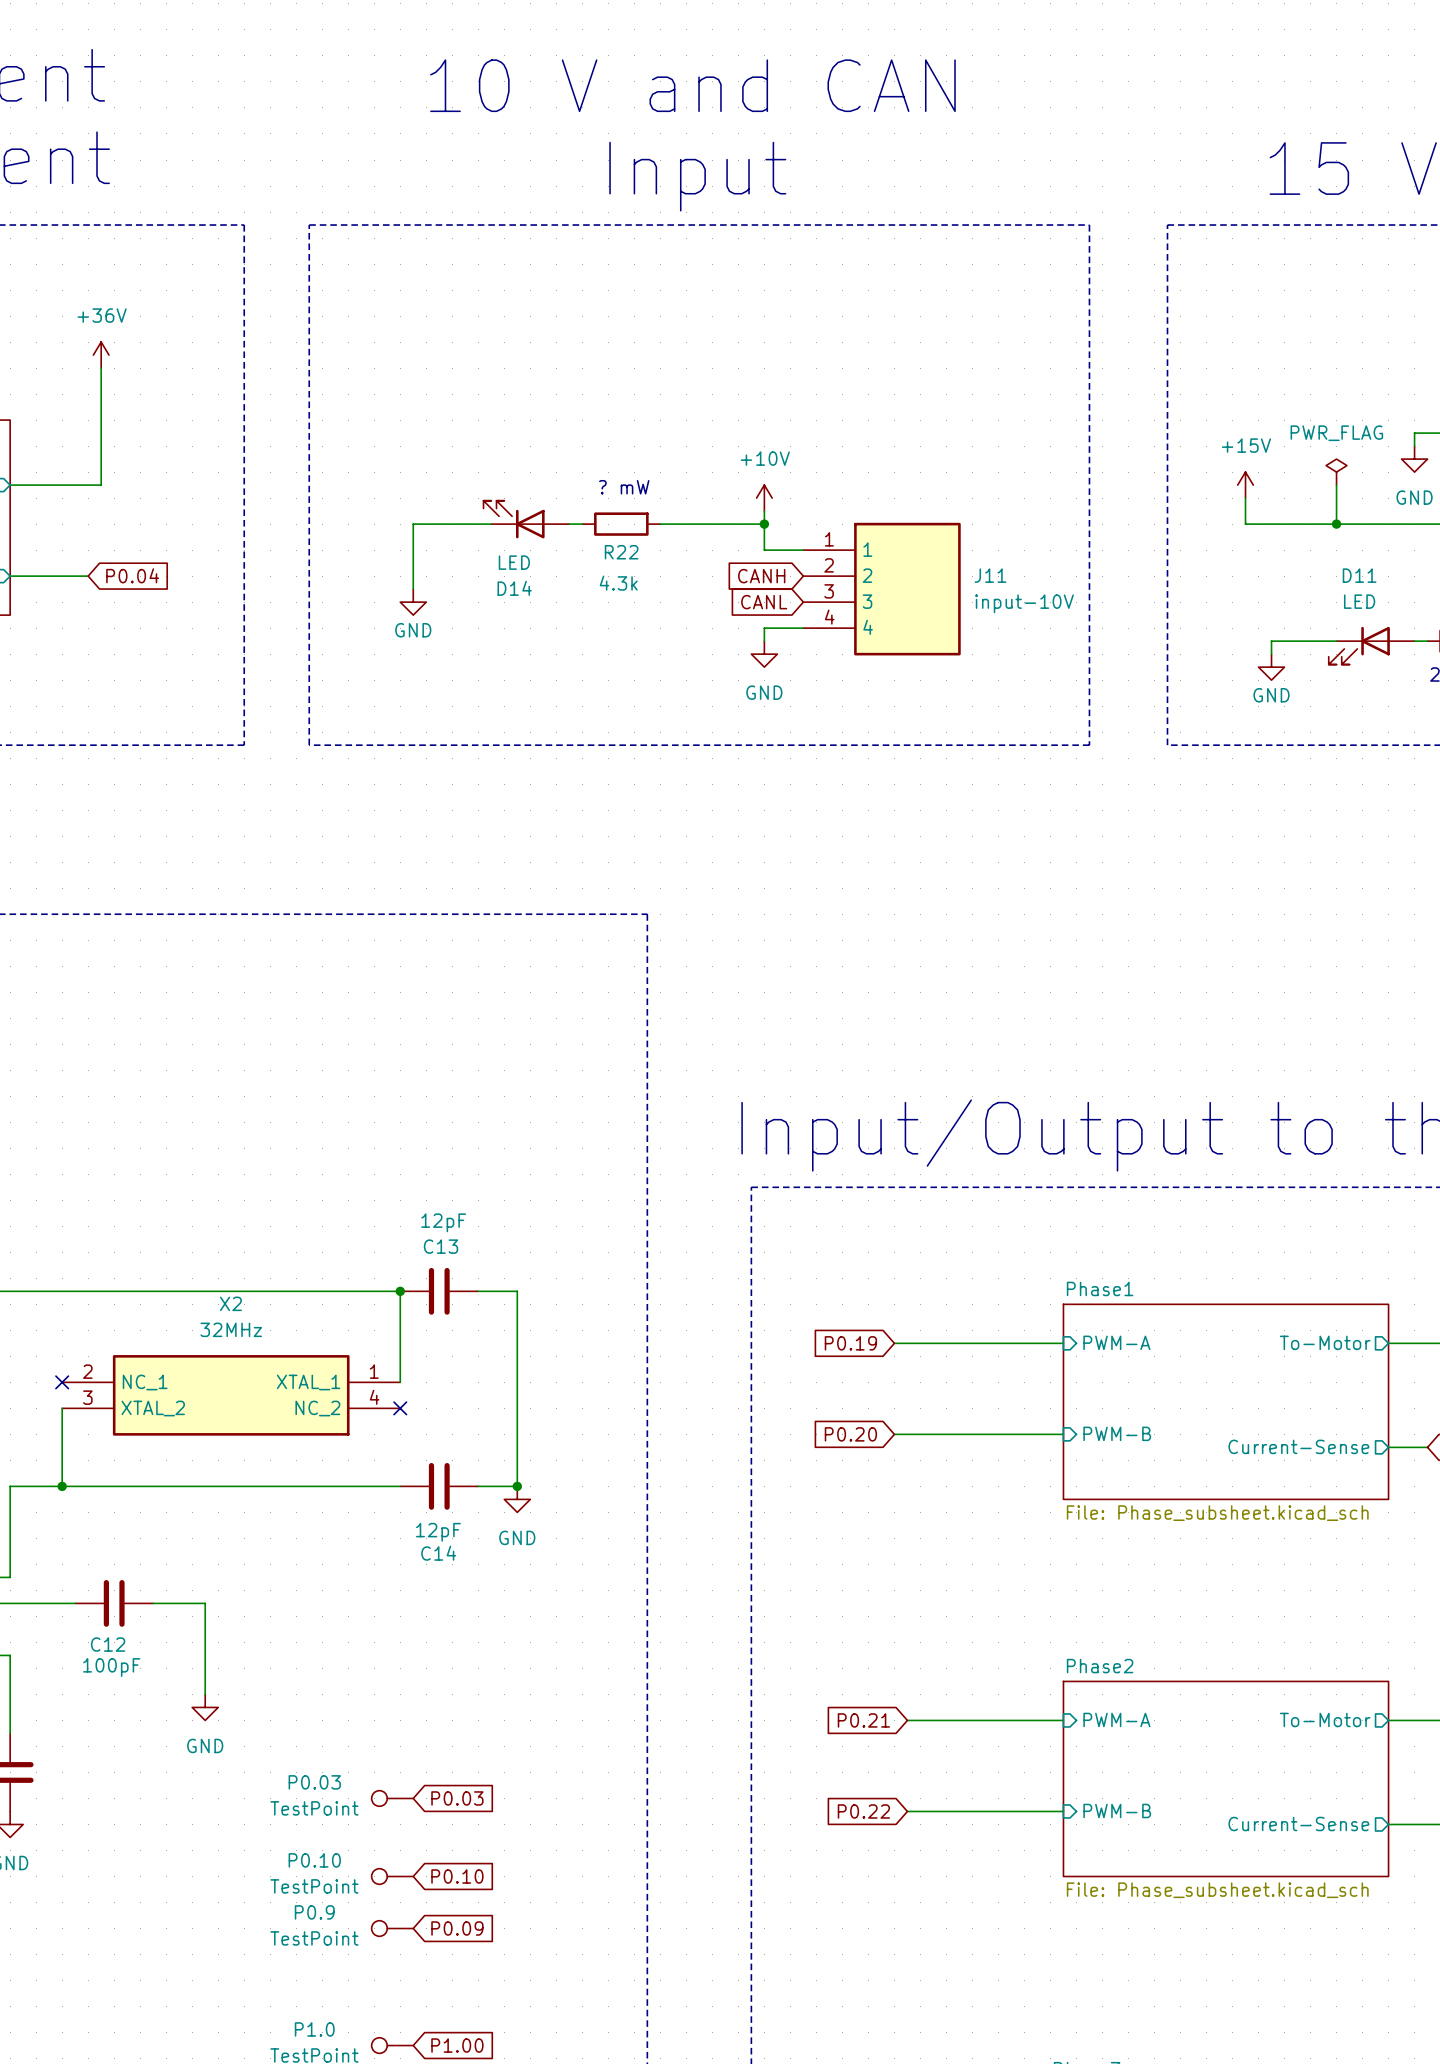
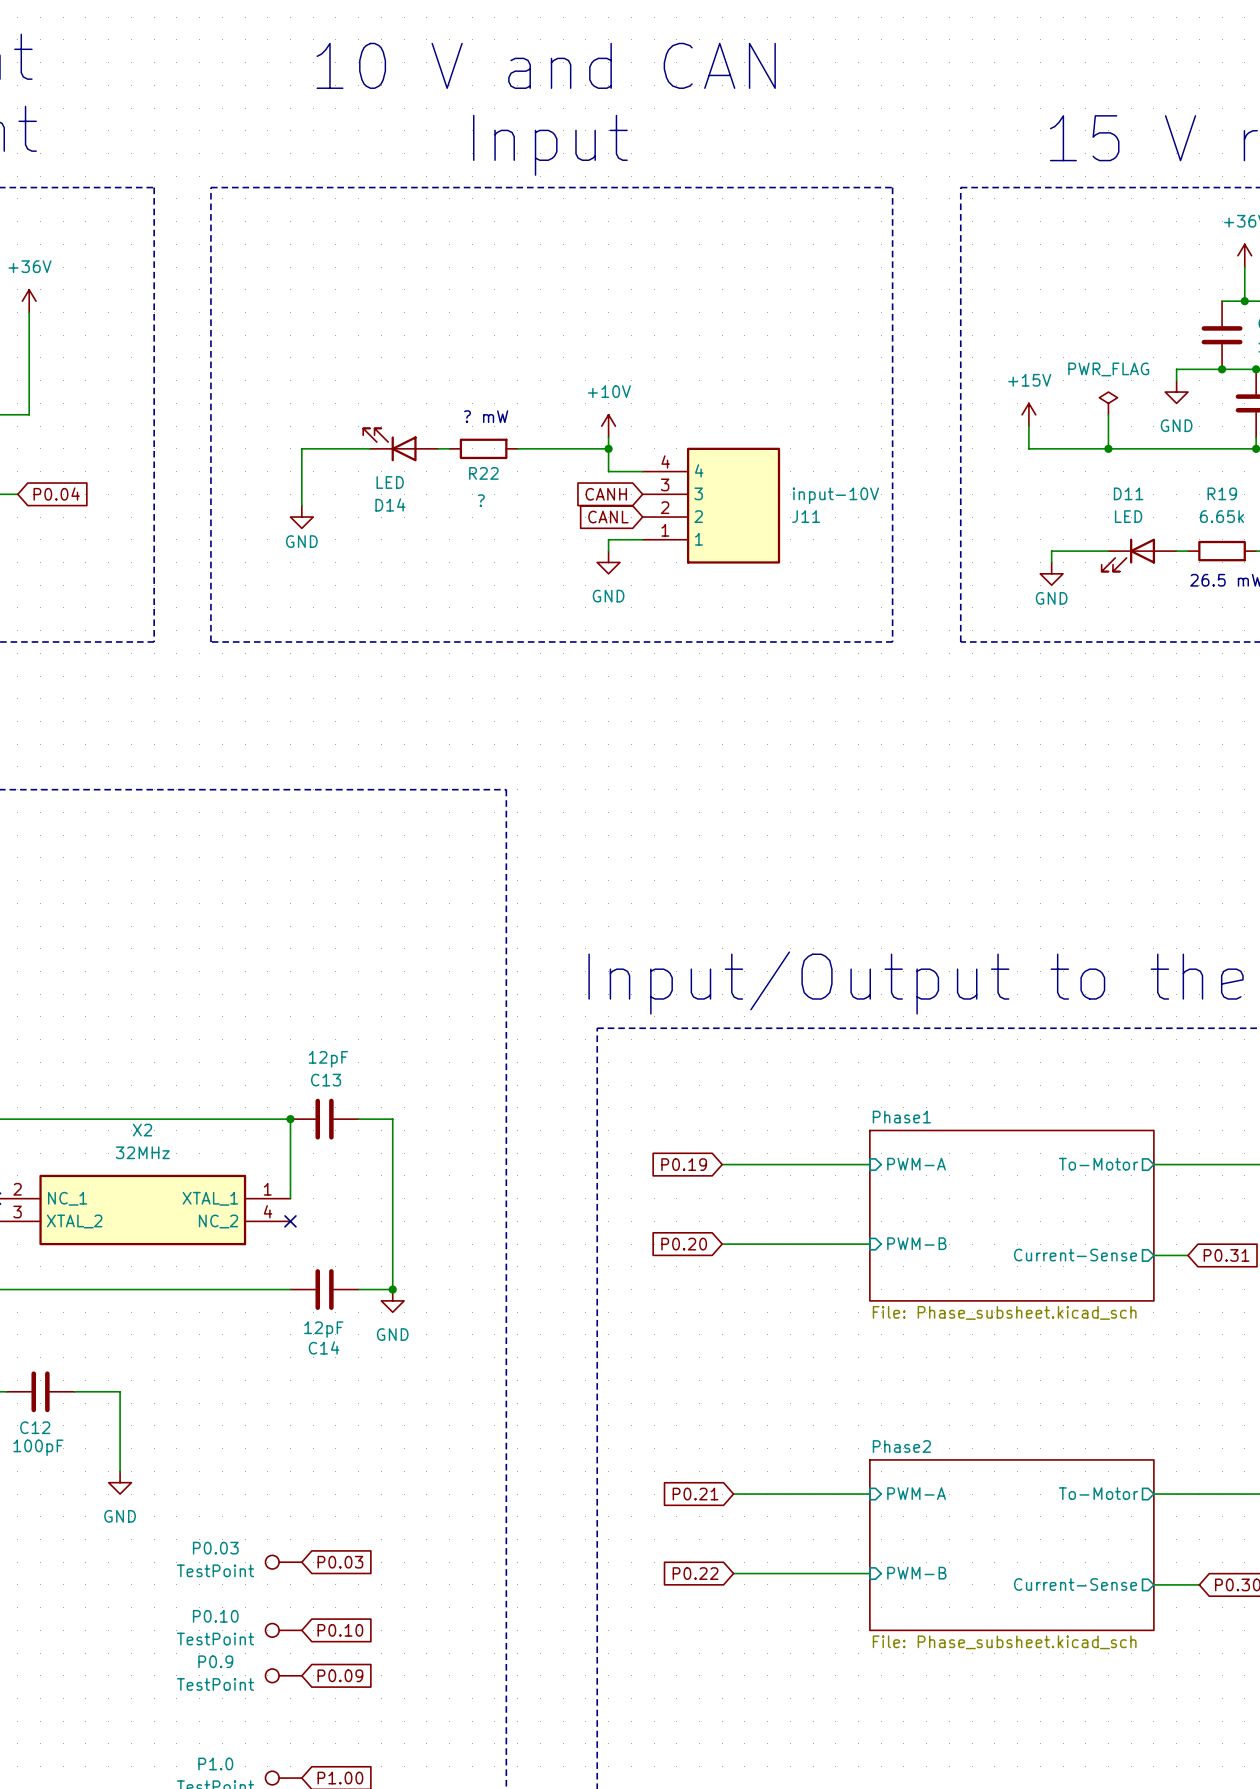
R22 value: 4.3k (618, 583) -> ? (481, 500)
J11 flip: as is (907, 589) -> up-down (733, 505)

